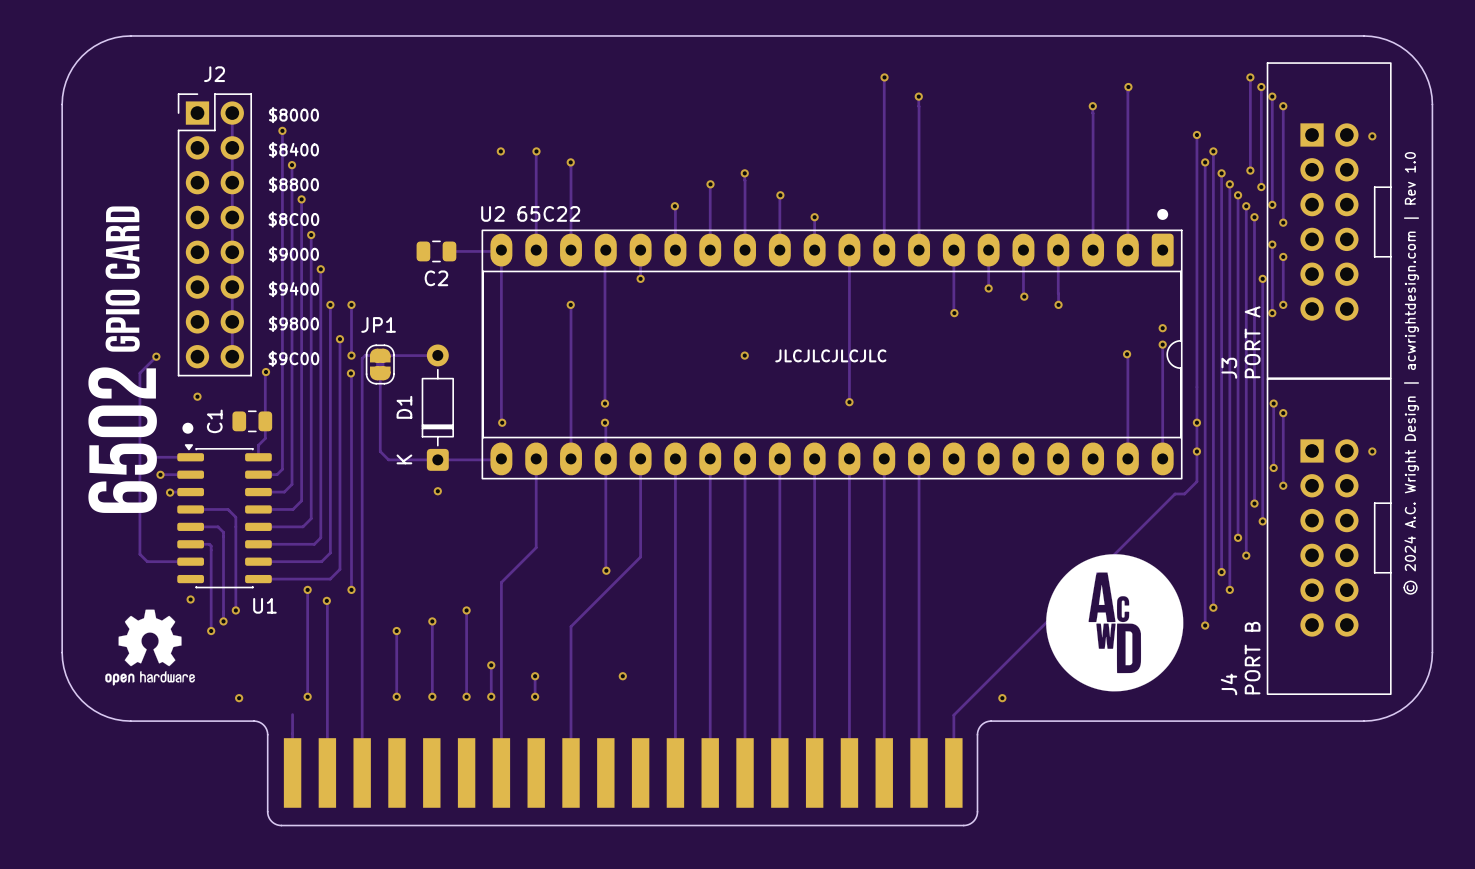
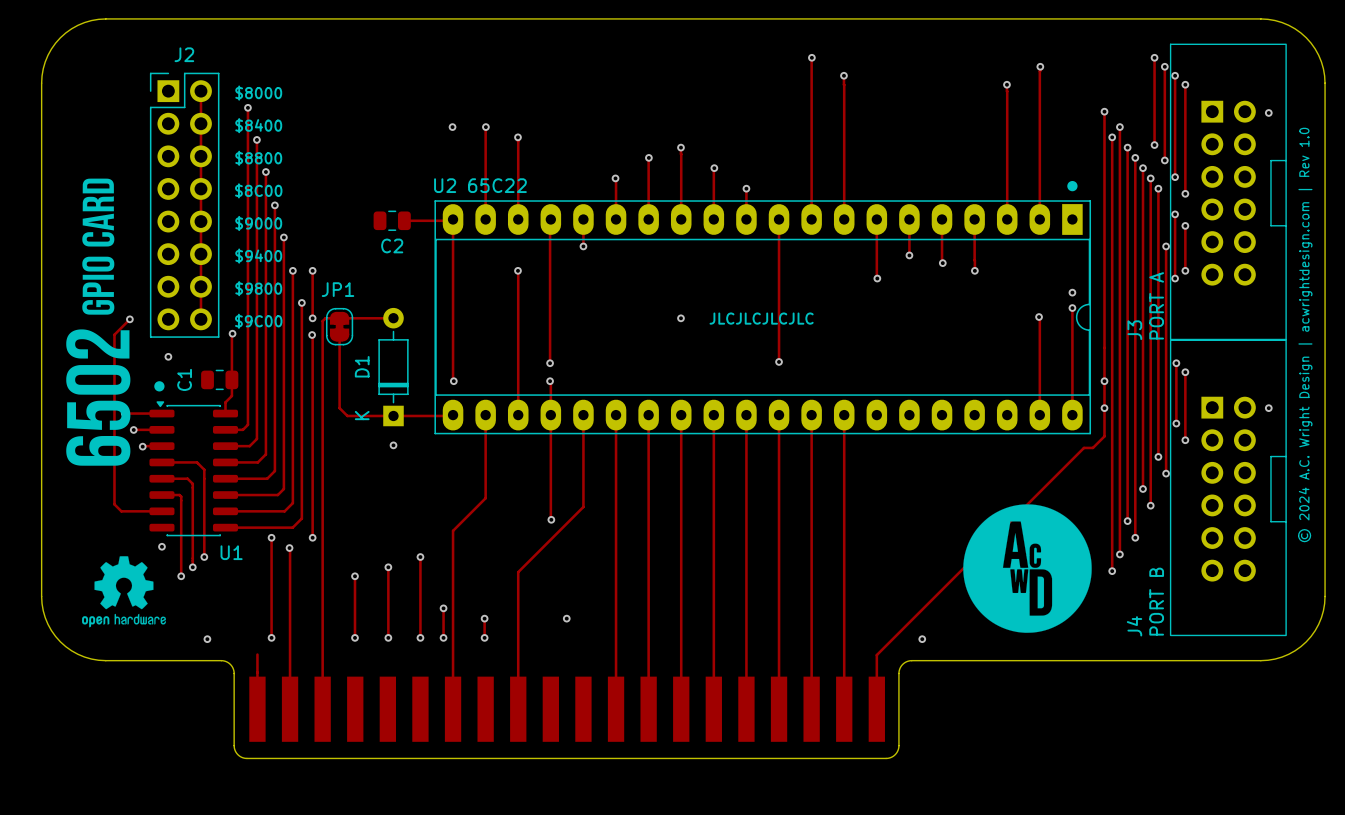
U2 footprint: [481, 229, 1183, 480] -> [434, 200, 1092, 435]
D1 footprint: [421, 344, 454, 471] -> [378, 307, 409, 427]

